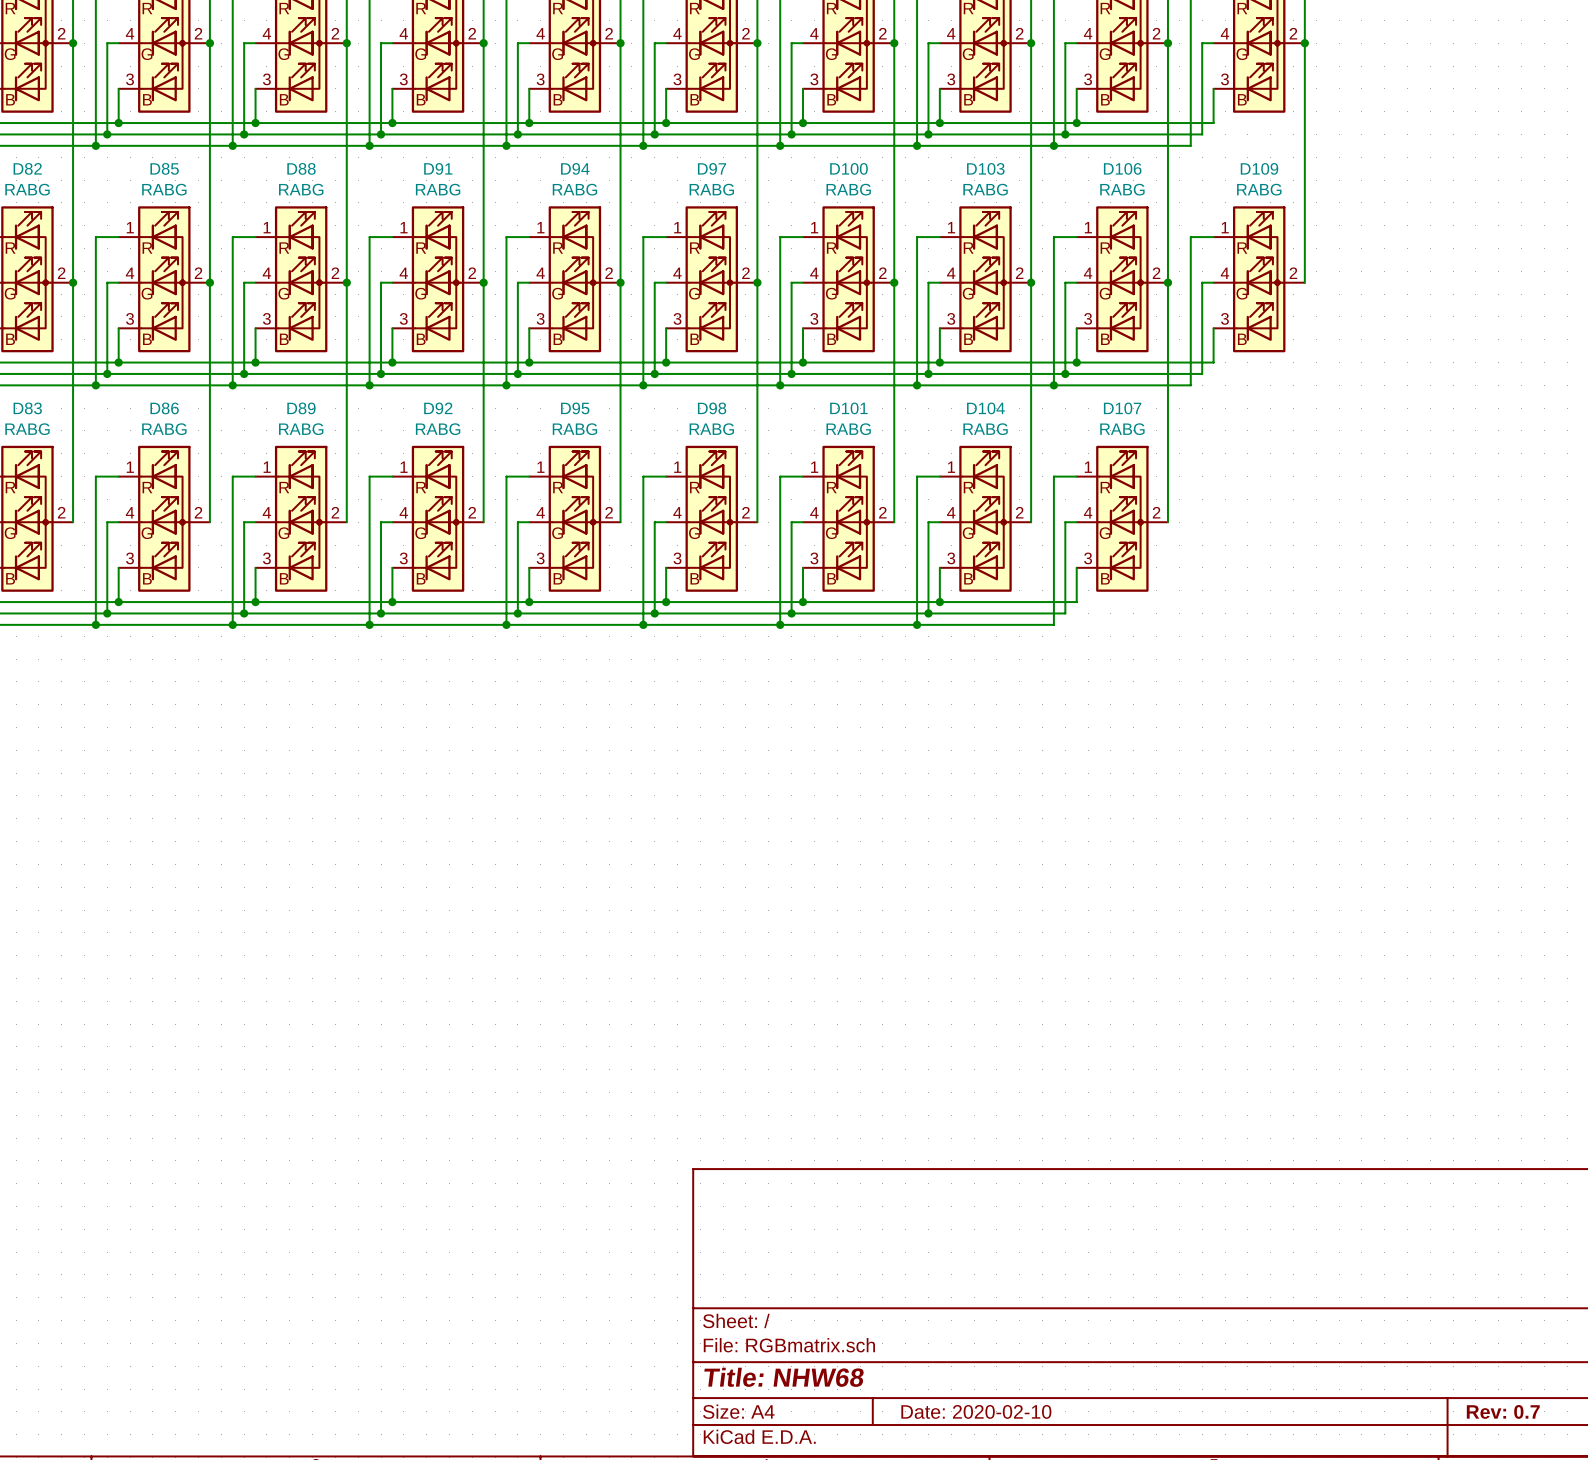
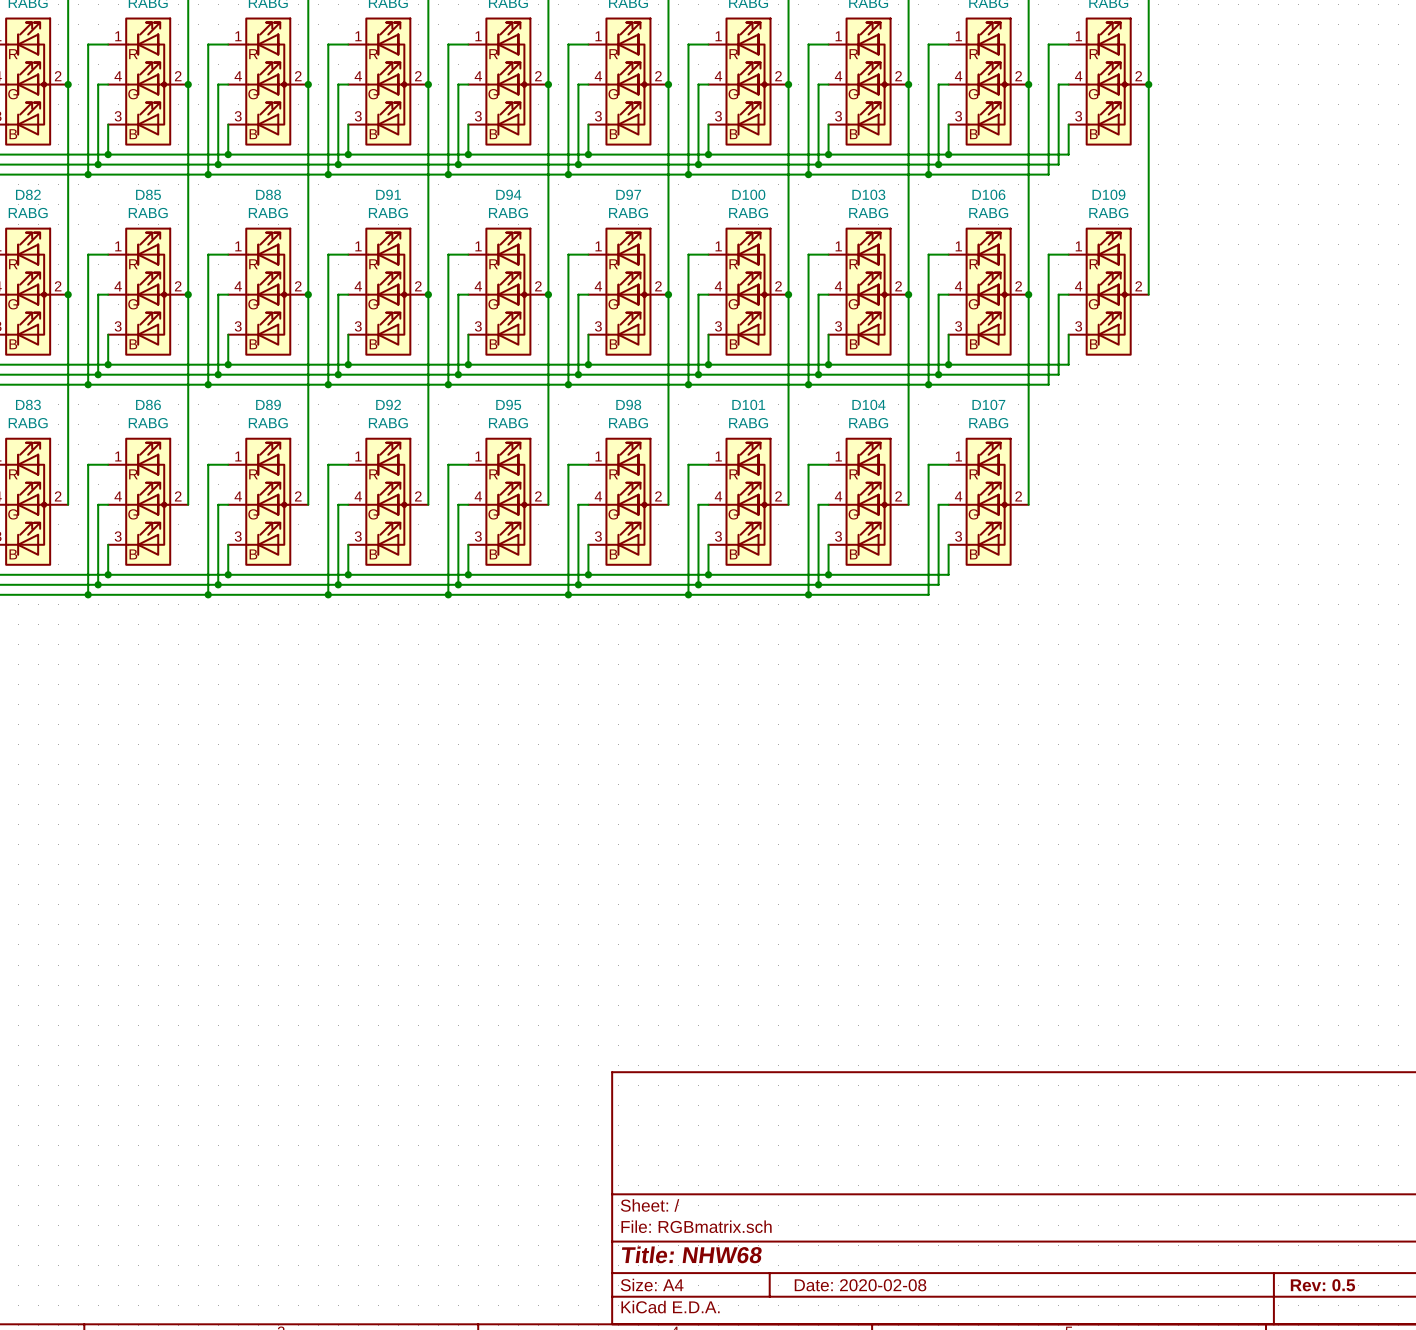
title block: Date: 2020-02-10 (976, 1411) -> Date: 2020-02-08 (860, 1285)
title block: Rev: 0.7 (1503, 1411) -> Rev: 0.5 (1322, 1285)

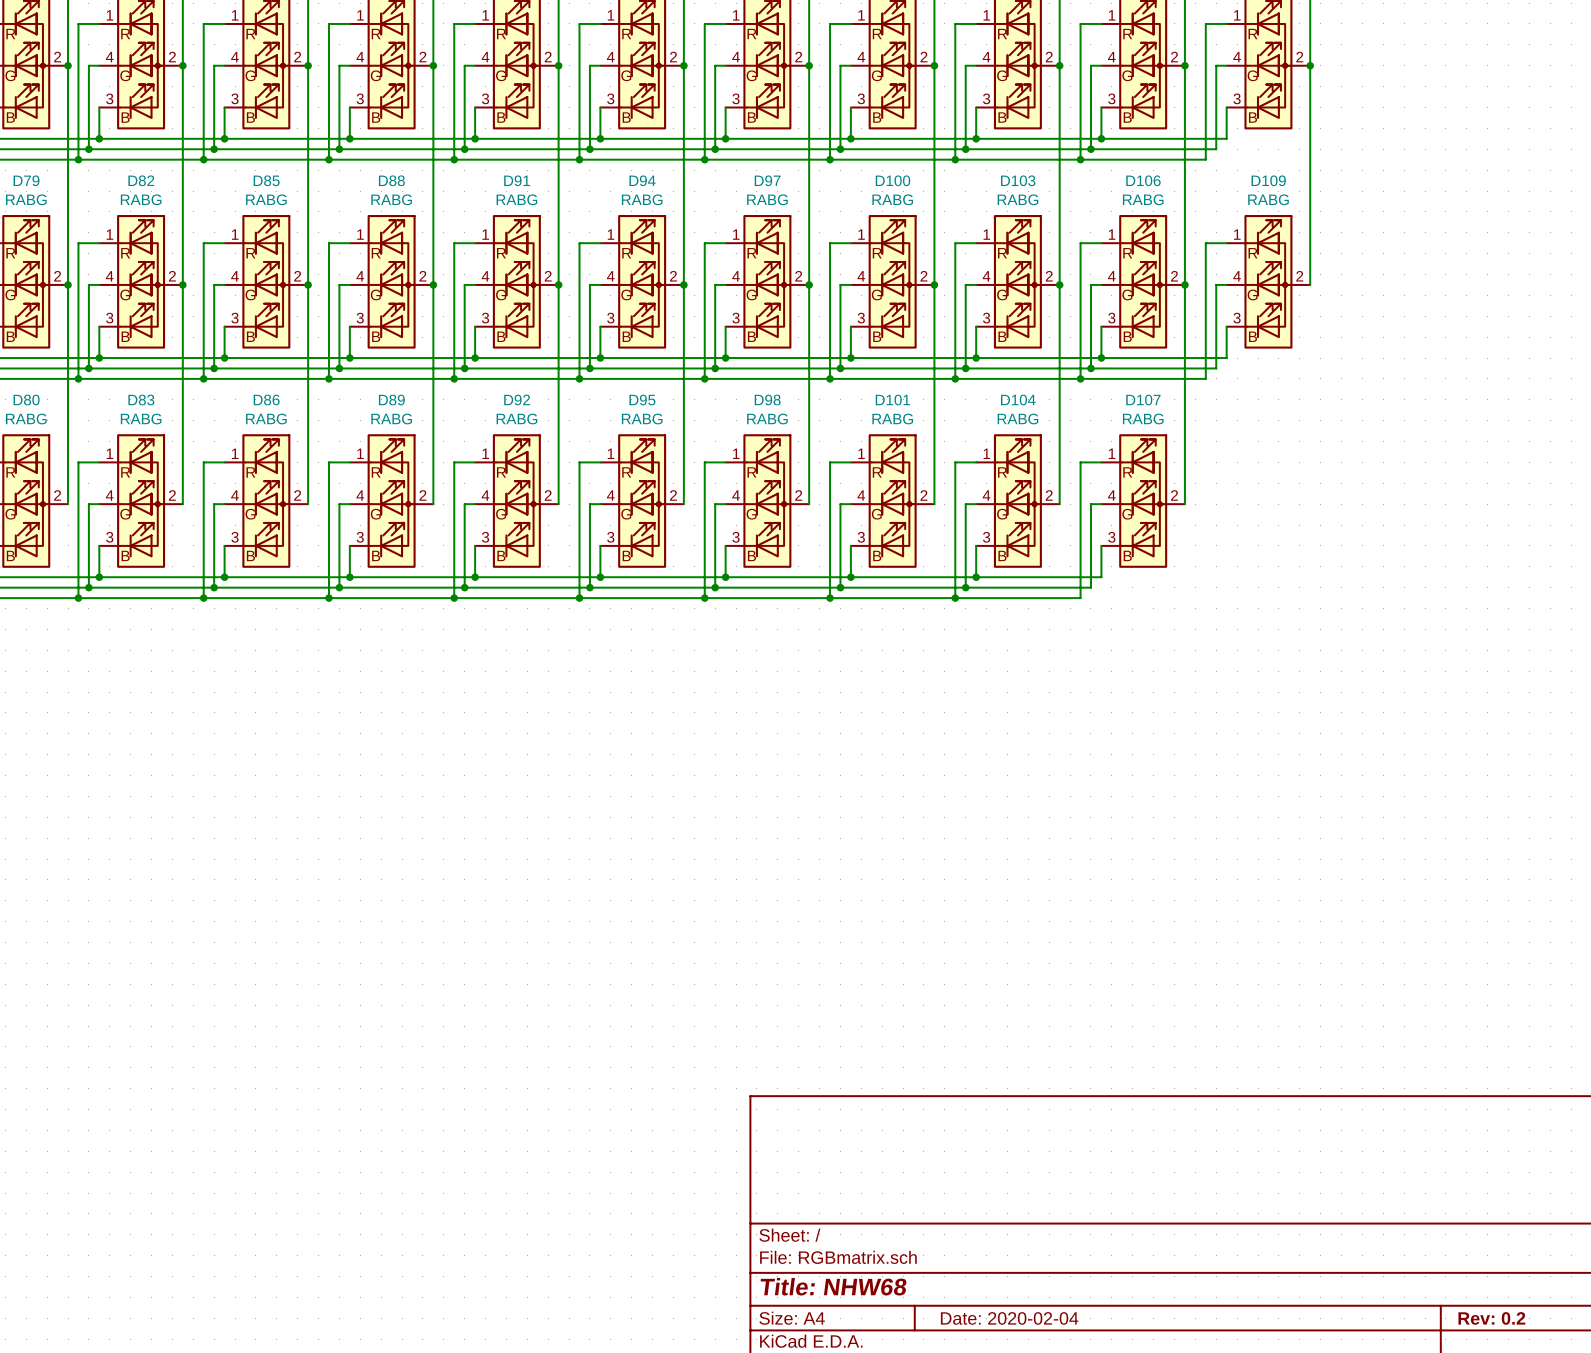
title block: Date: 2020-02-08 (860, 1285) -> Date: 2020-02-04 (1009, 1318)
title block: Rev: 0.5 (1322, 1285) -> Rev: 0.2 (1491, 1318)

